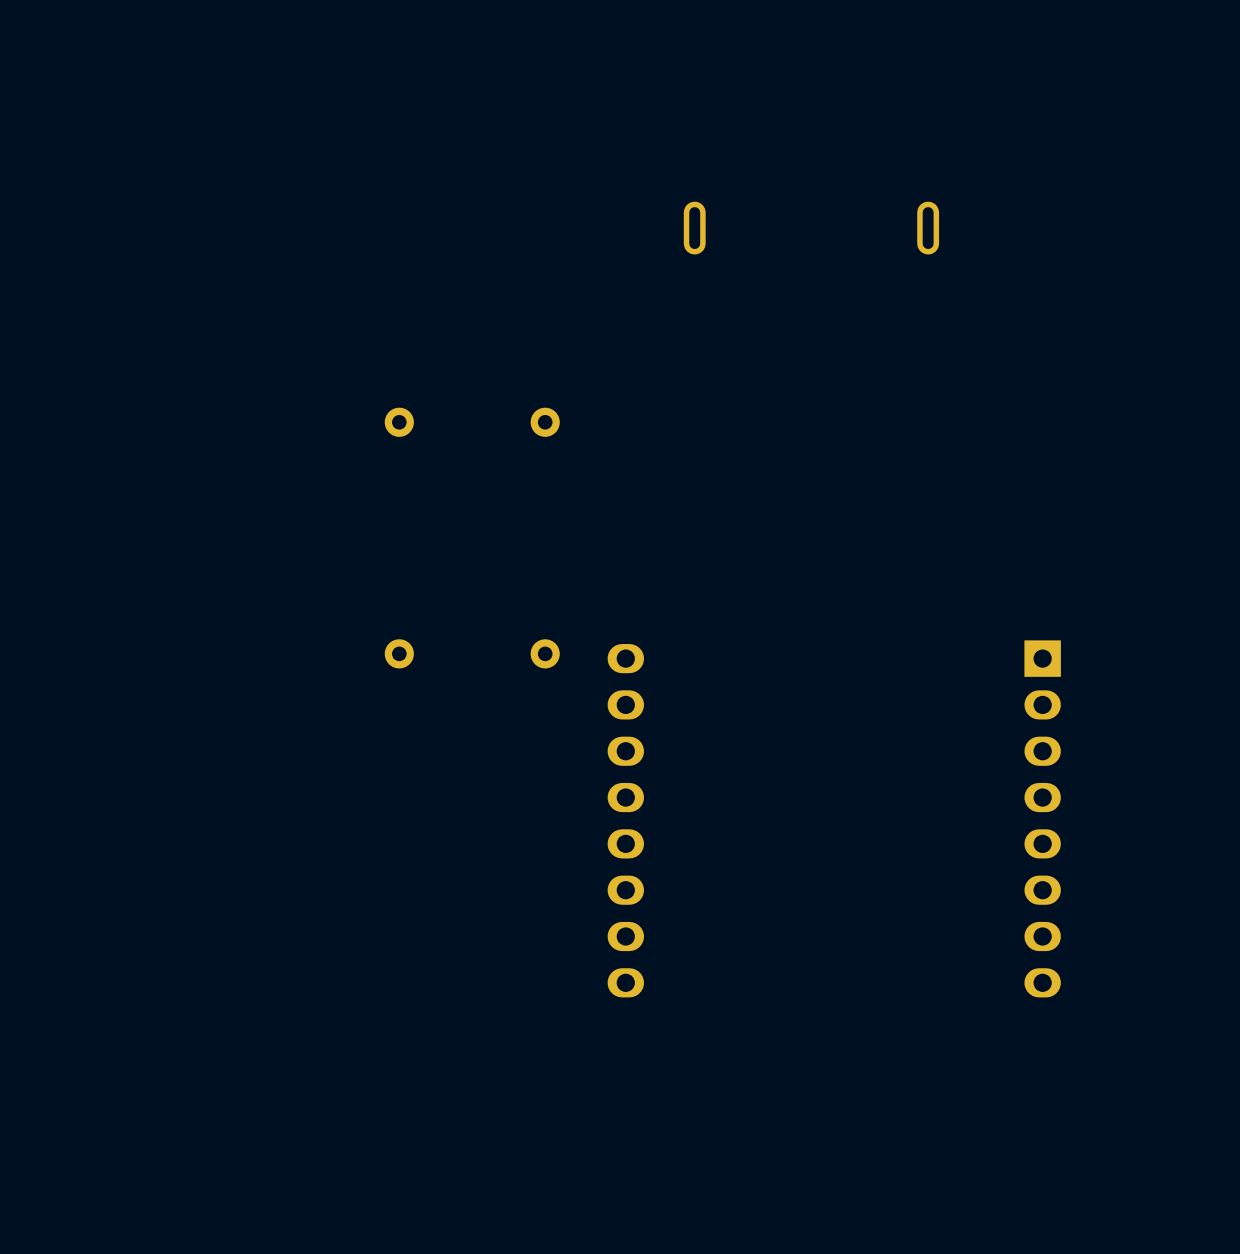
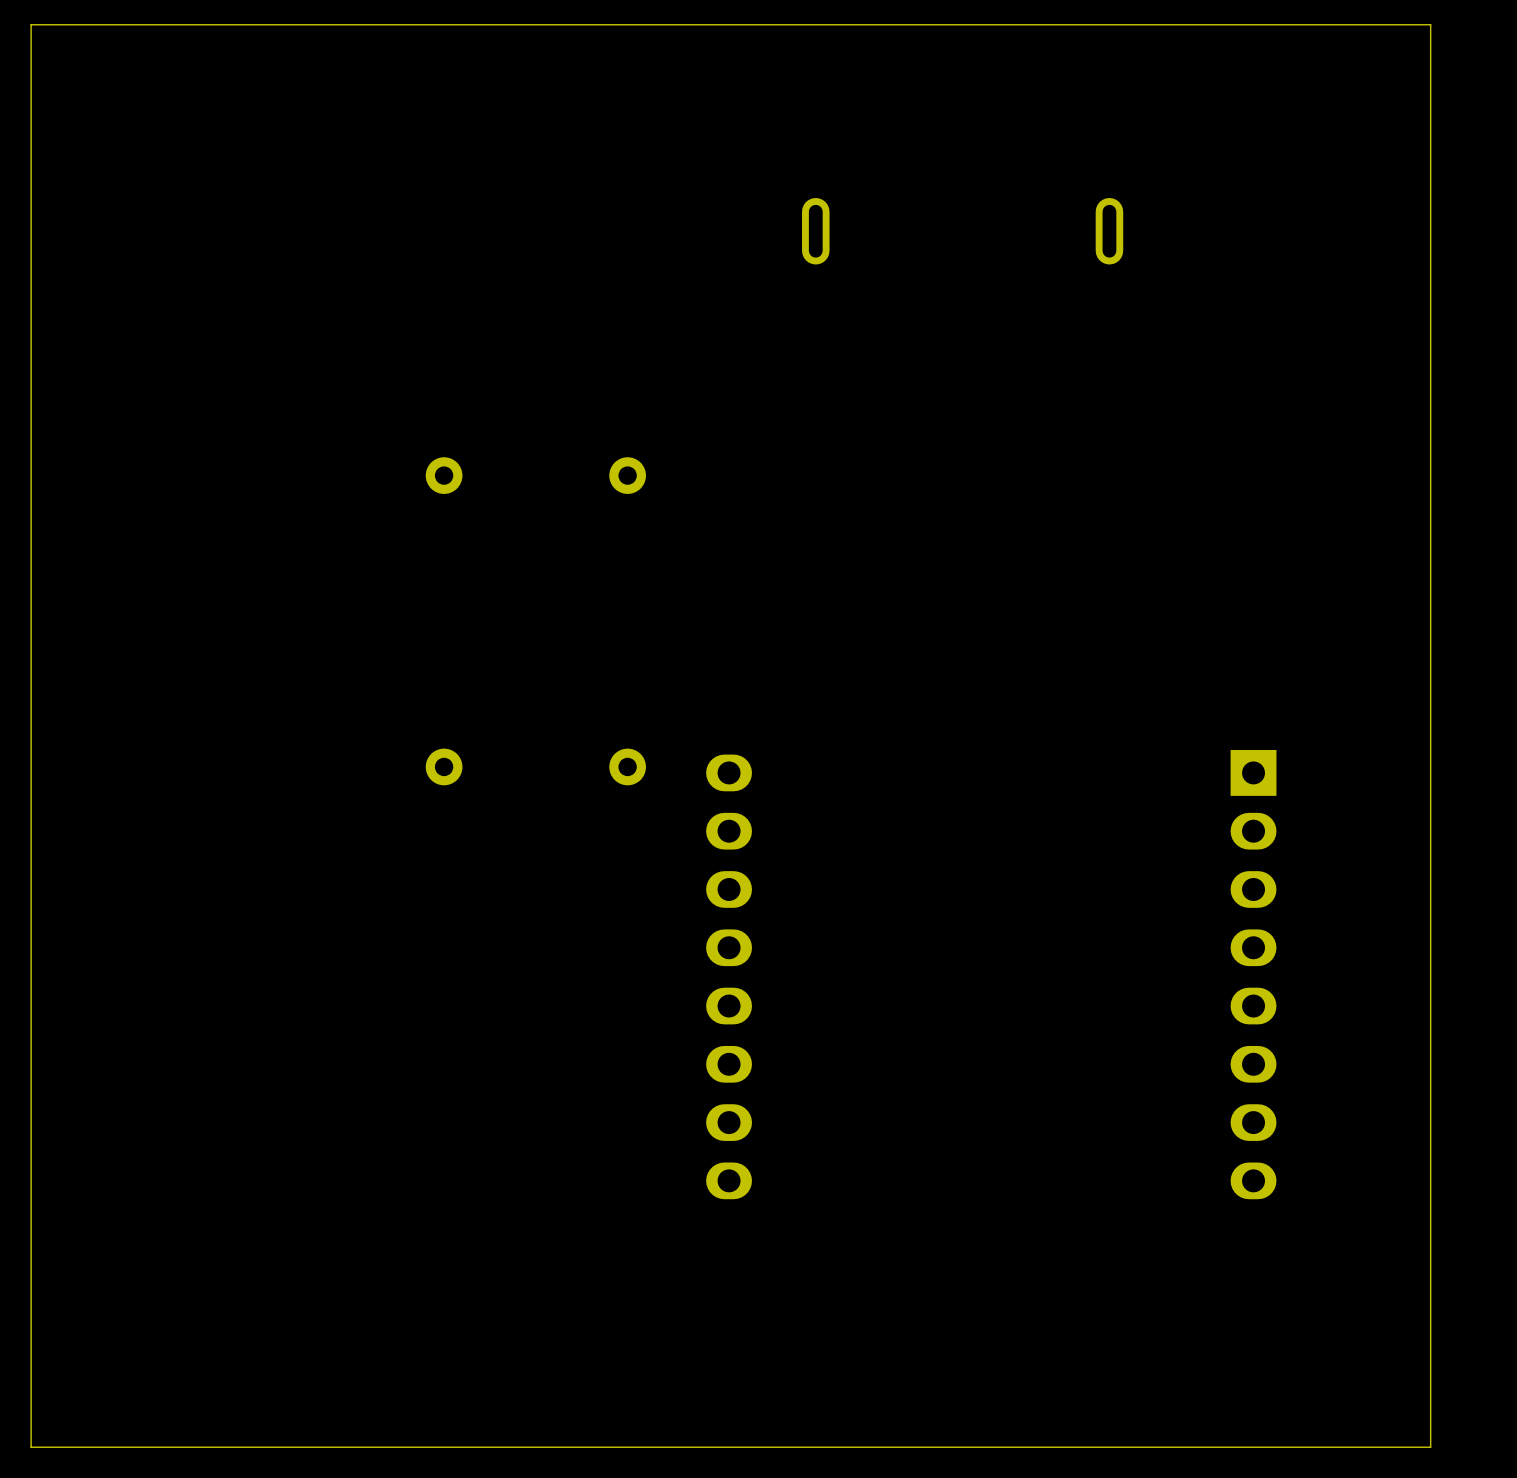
board edge: none -> (1430, 24) (31, 24) (31, 1447) (1430, 1447) (1430, 24)

